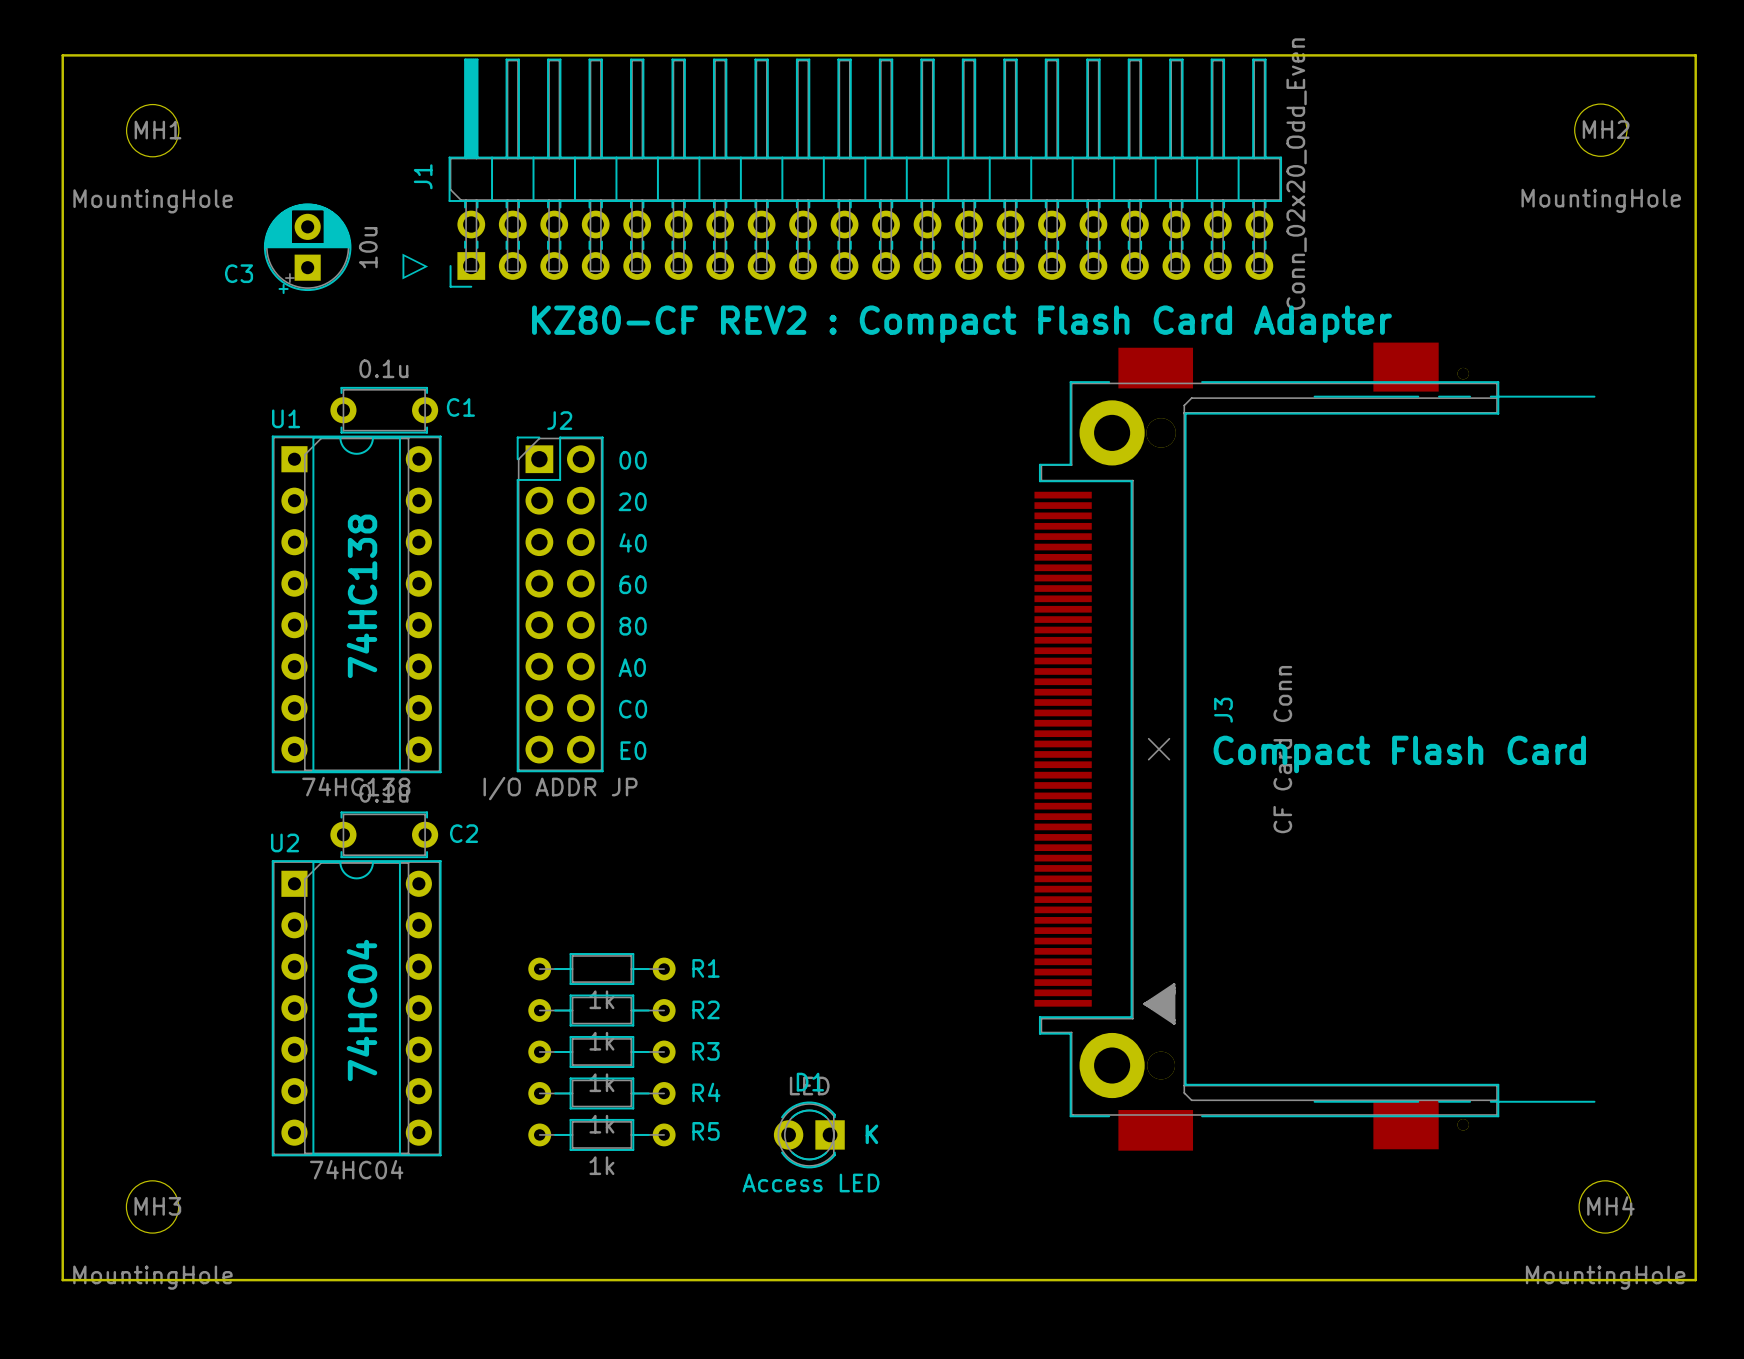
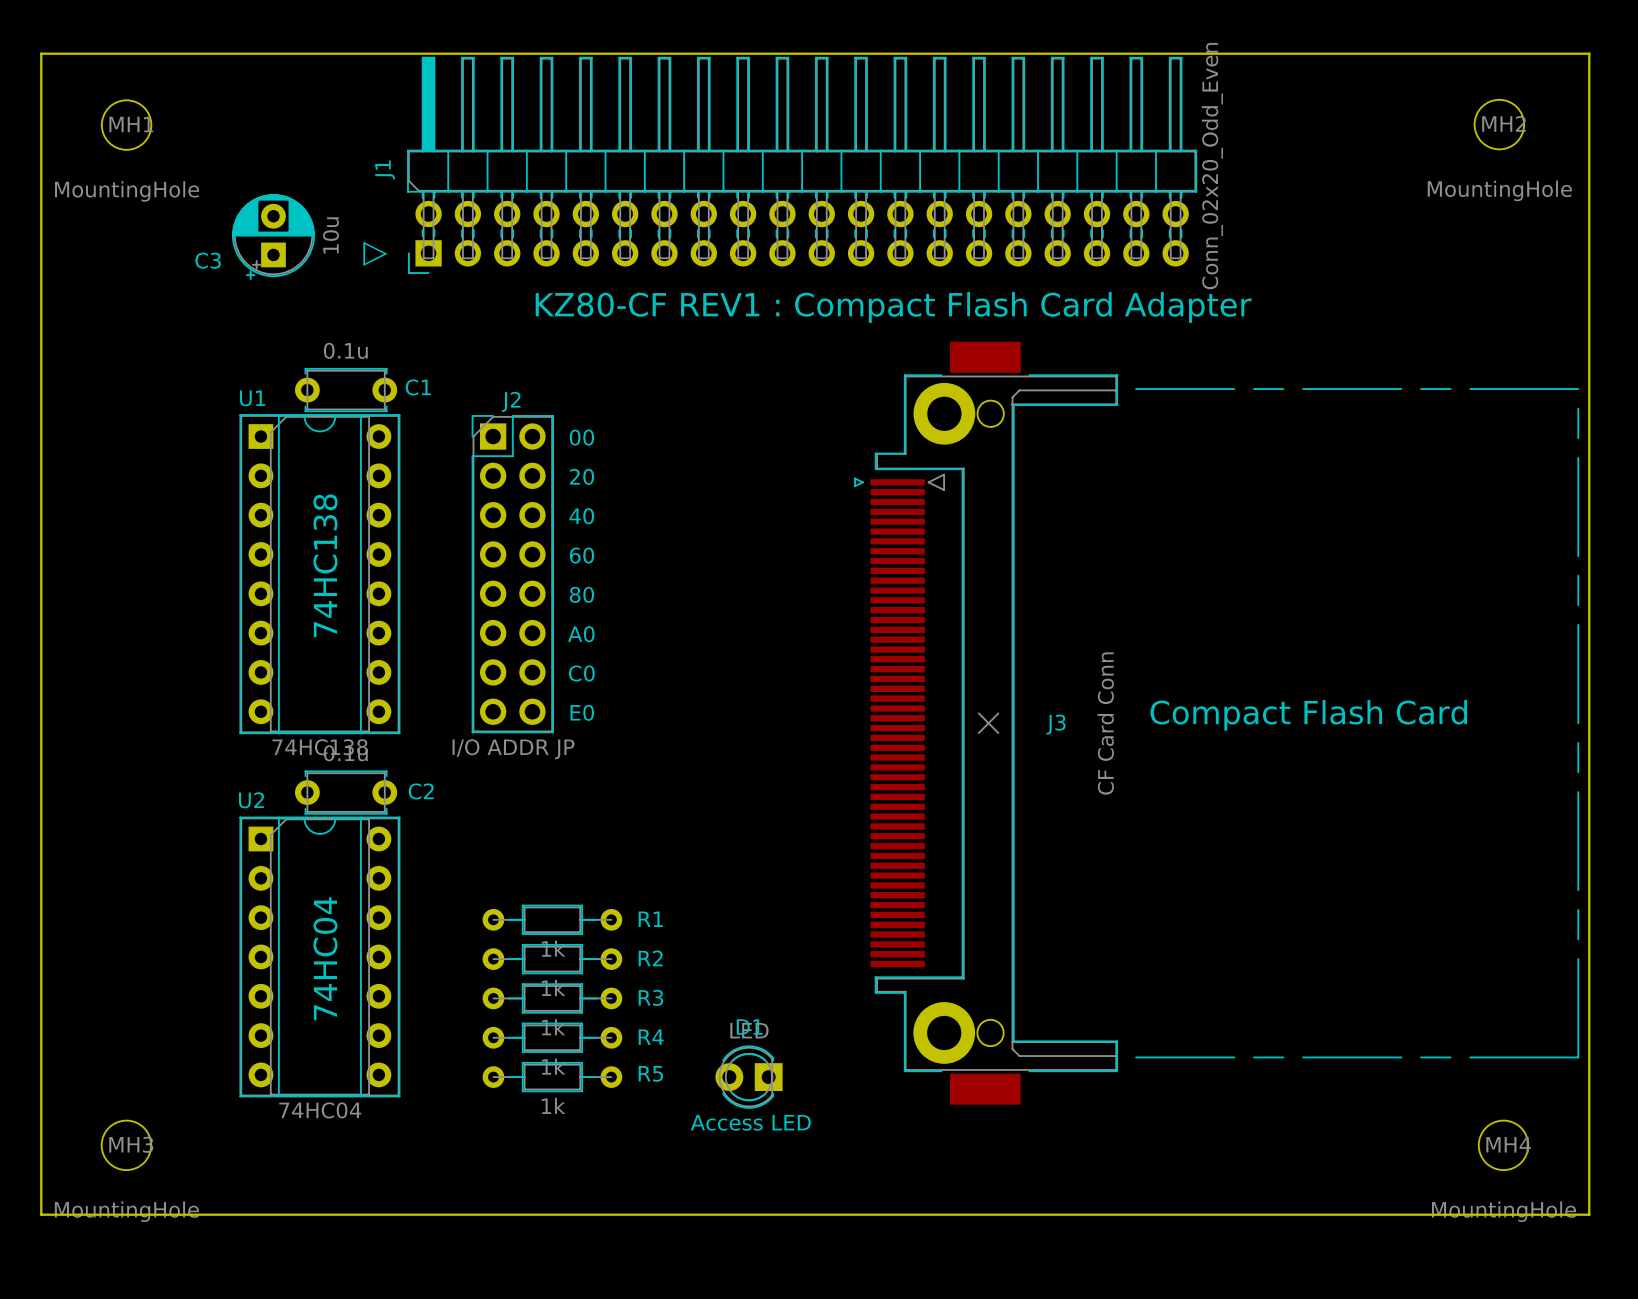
text: KZ80-CF REV2 : Compact Flash Card Adapter (961, 324) -> KZ80-CF REV1 : Compact Flash Card Adapter (893, 307)
J3 footprint: [1034, 342, 1596, 1151] -> [854, 341, 1580, 1105]
J3 name position: J3 (1223, 710) -> J3 (1055, 724)
J3 value position: CF Card Conn (1282, 749) -> CF Card Conn (1105, 723)
text: K (871, 1134) -> none

